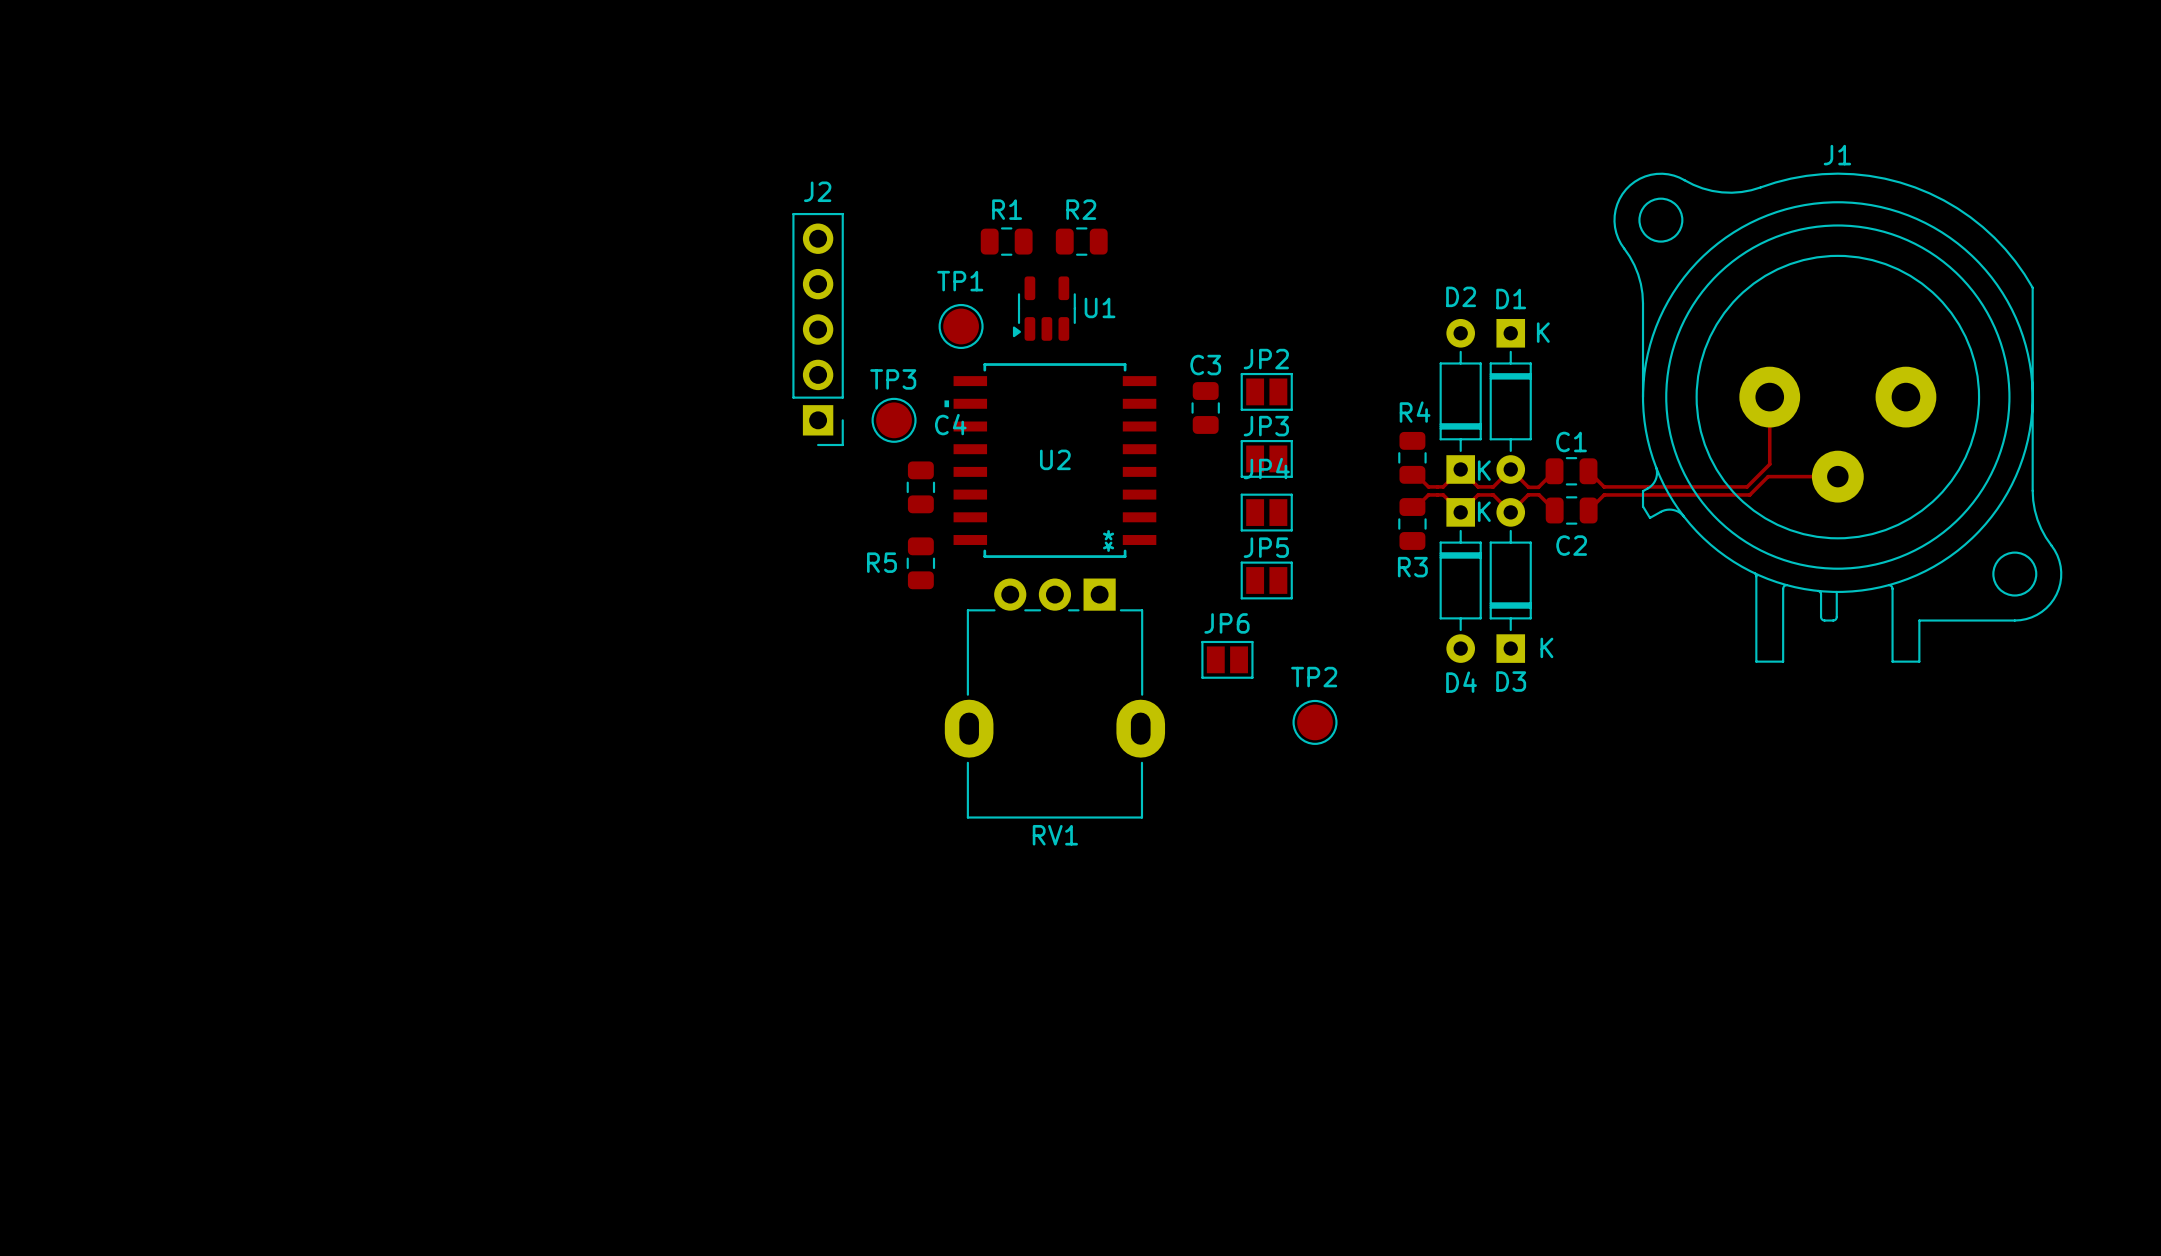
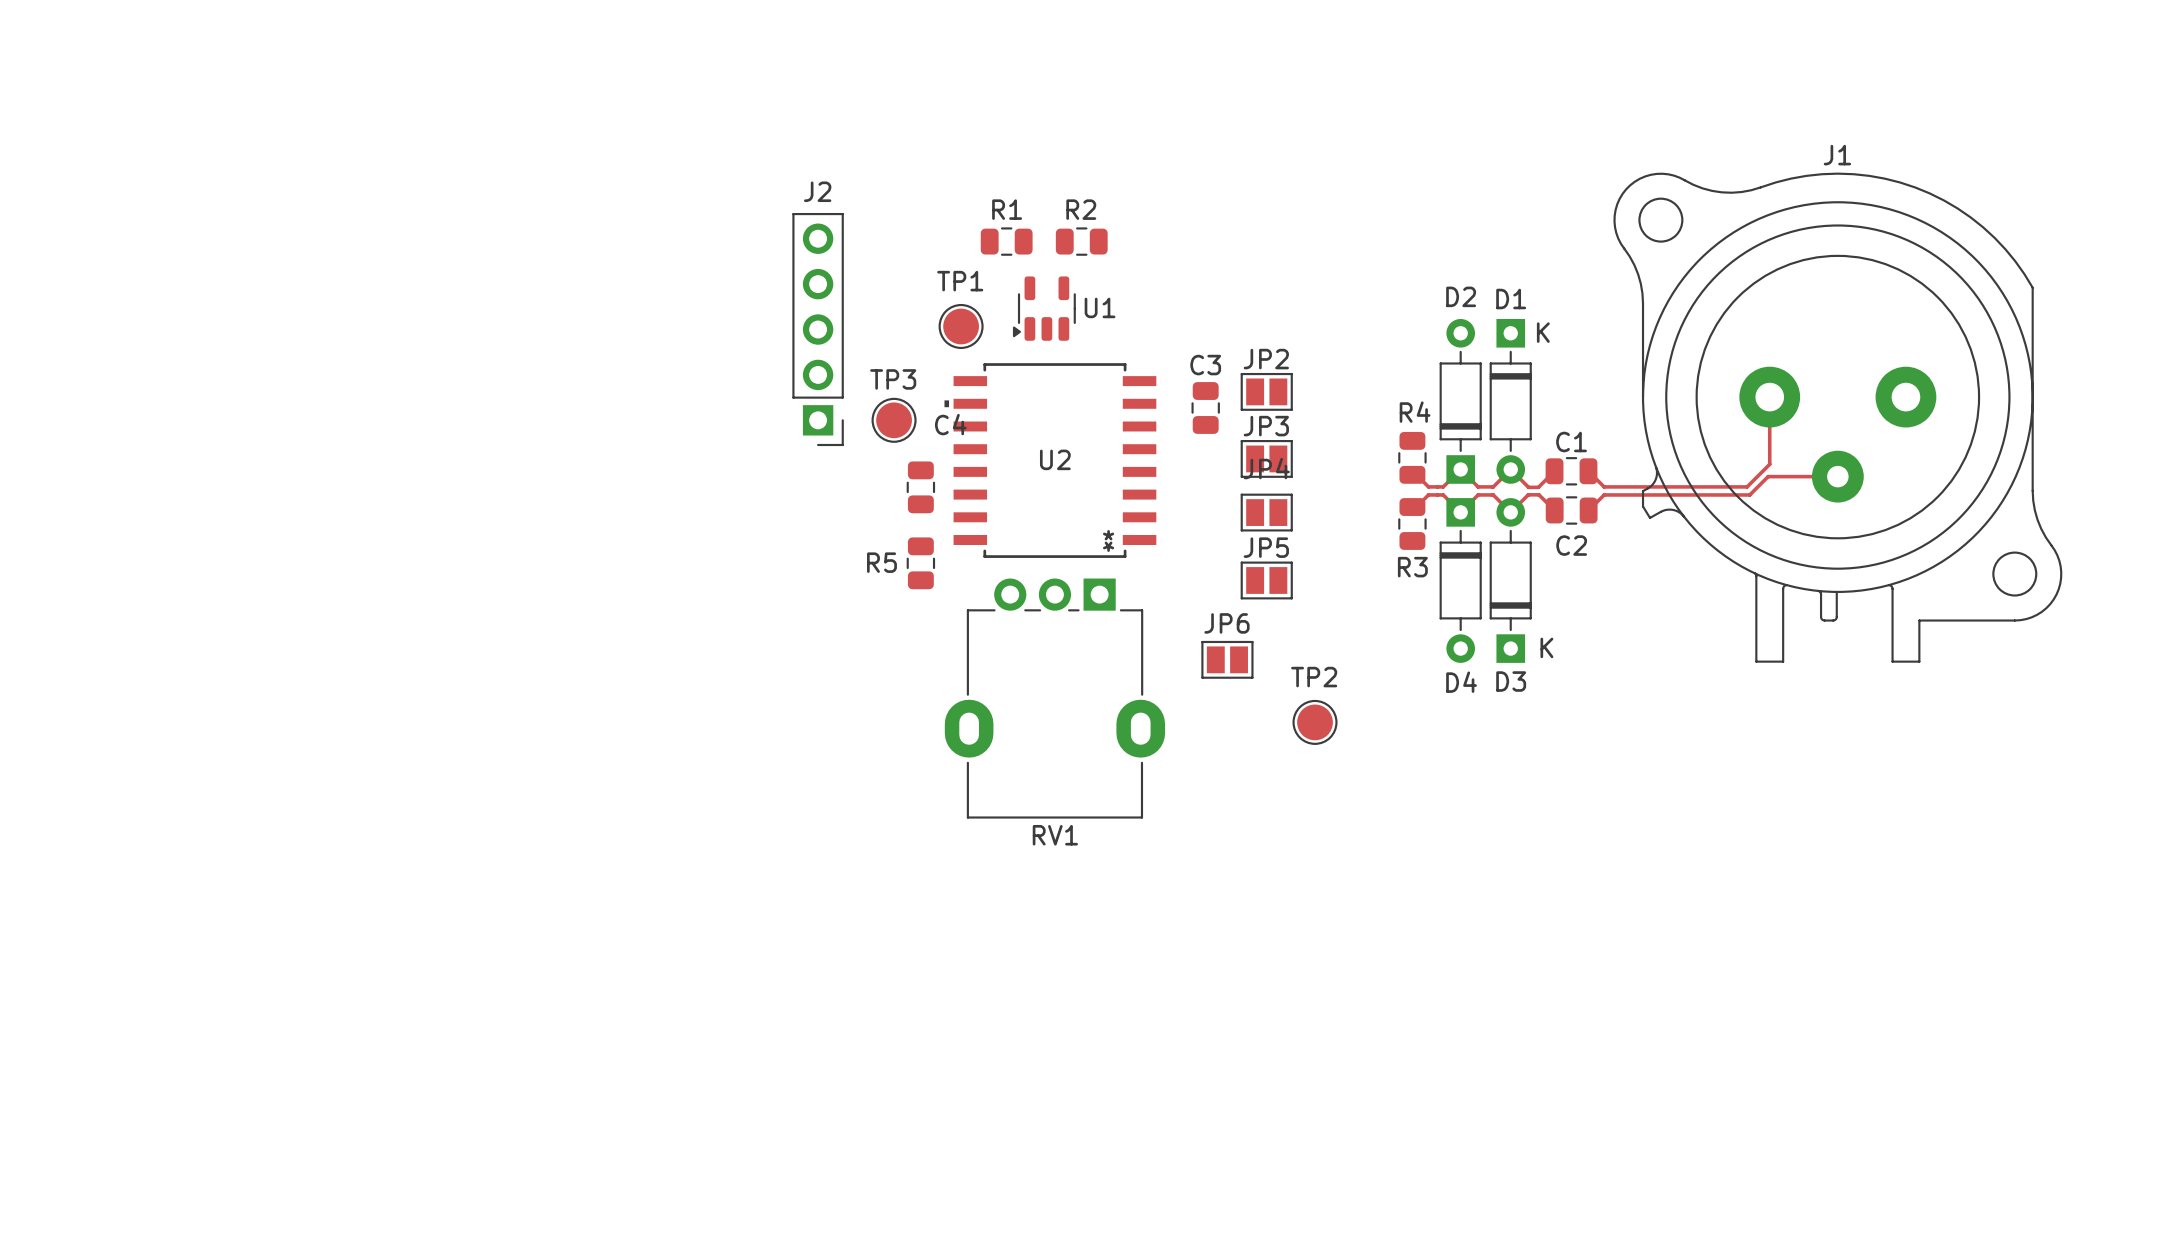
D2 text: K (1484, 470) -> none
D4 text: K (1484, 511) -> none

